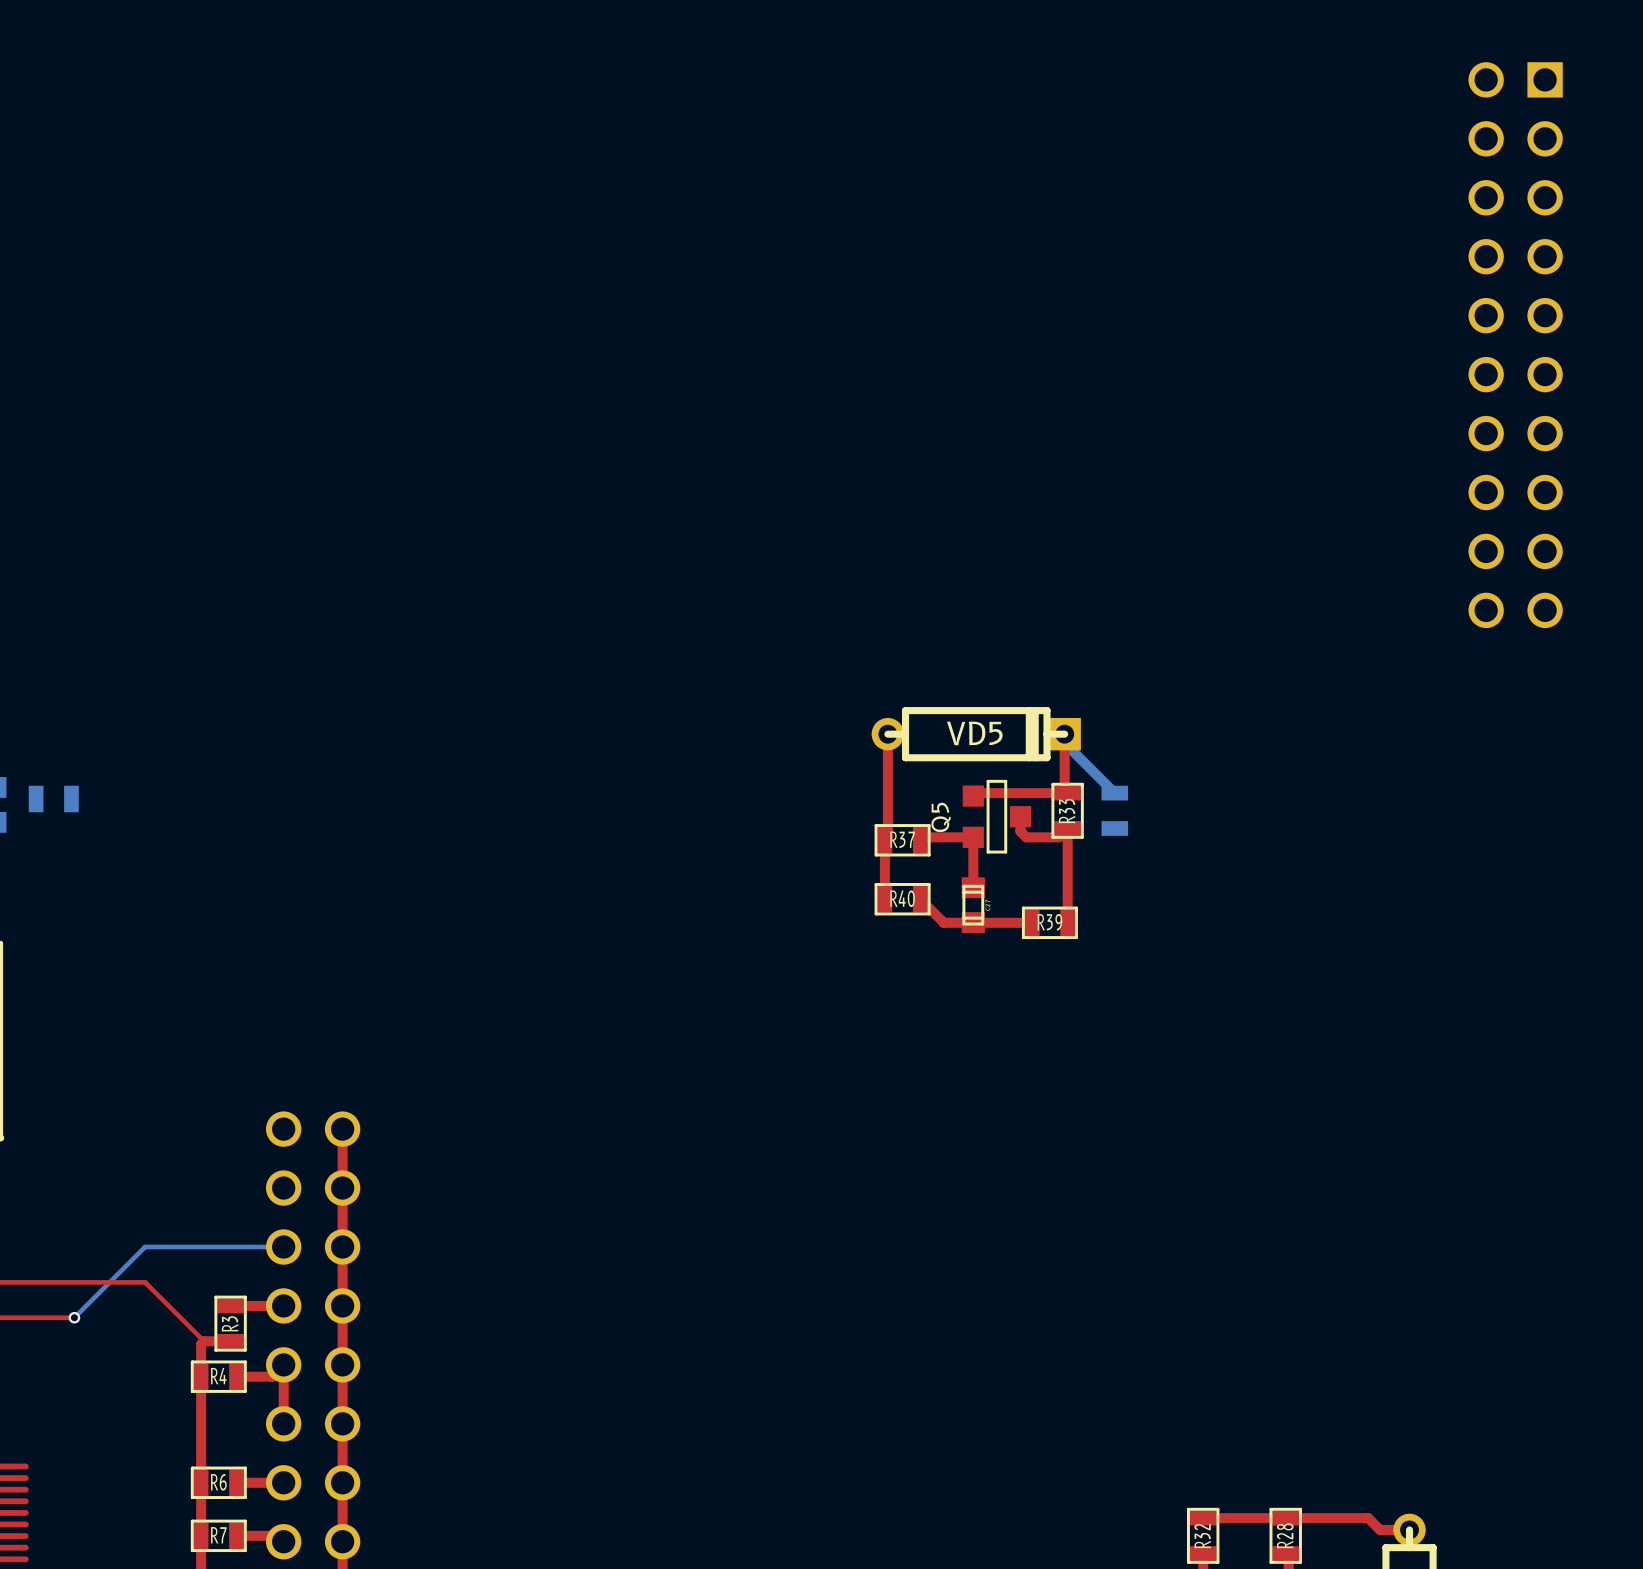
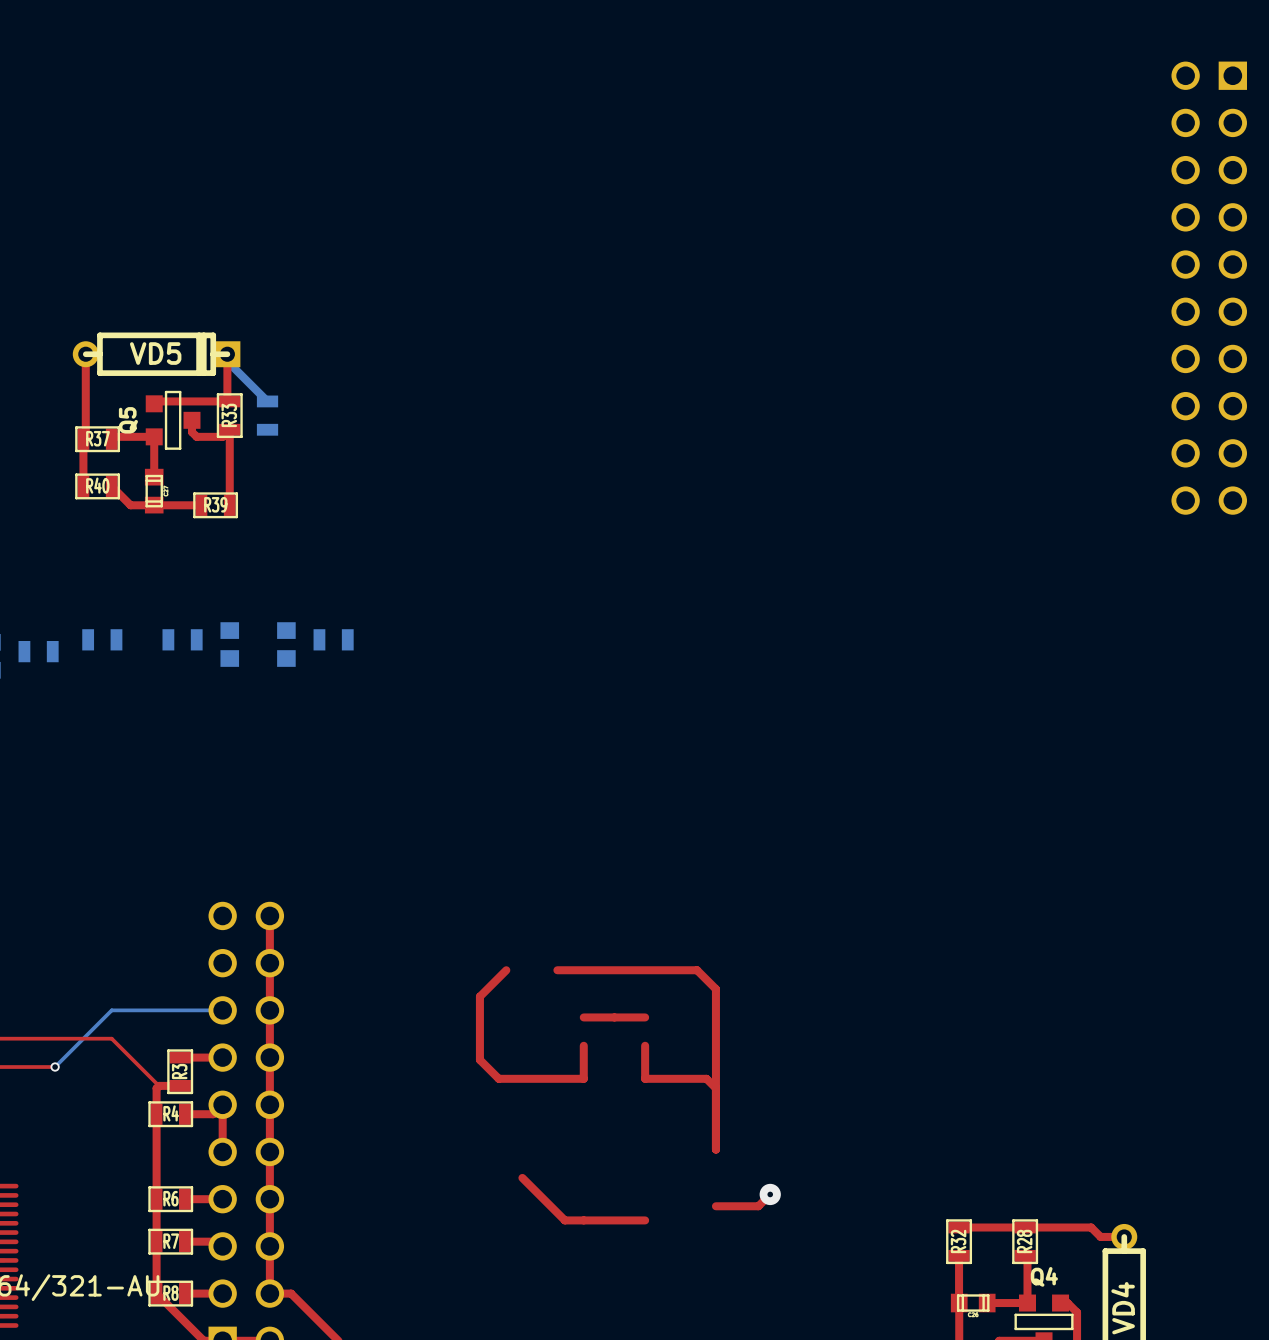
top track: none -> (85, 354) (83, 486)
bottom track: none -> (227, 354) (227, 361) (267, 401)
top track: none -> (227, 354) (227, 399) (229, 401) (156, 401) (154, 403)
part: none -> (267, 415)
top track: none -> (191, 420) (191, 432) (196, 436) (222, 436) (229, 429) (229, 505)
top track: none -> (111, 439) (114, 436) (154, 436) (154, 477)
top track: none -> (111, 486) (130, 505) (154, 505)
top track: none -> (154, 505) (201, 505)
top track: (887, 734) (887, 837) (884, 840) (884, 899) -> none
VD5 position: (976, 734) -> (156, 354)
bottom track: (1064, 734) (1064, 743) (1114, 793) -> none
top track: (1064, 734) (1064, 790) (1067, 793) (976, 793) (973, 796) -> none
part: none -> (102, 639)
part: none -> (182, 639)
part: none -> (333, 639)
part: none -> (229, 644)
part: none -> (286, 644)
R33 position: (1067, 810) -> (229, 415)
part: (1114, 810) -> none
Q5 position: (996, 816) -> (173, 420)
top track: (1020, 816) (1020, 831) (1026, 837) (1058, 837) (1067, 828) (1067, 922) -> none
R37 position: (902, 840) -> (97, 439)
top track: (920, 840) (923, 837) (973, 837) (973, 887) -> none
R40 position: (902, 899) -> (97, 486)
top track: (920, 899) (943, 922) (973, 922) -> none
part position: (973, 905) -> (154, 491)
top track: (973, 922) (1032, 922) -> none
R39 position: (1049, 922) -> (215, 505)
top track: none -> (506, 970) (479, 996) (479, 1059) (498, 1078) (583, 1078) (583, 1045)
top track: none -> (557, 970) (697, 970) (715, 989) (715, 1149)
top track: none -> (583, 1017) (645, 1017)
top track: none -> (645, 1045) (645, 1078) (706, 1078) (715, 1088)
top track: none -> (522, 1177) (564, 1220) (645, 1220)
top track: none -> (770, 1194) (758, 1206) (715, 1206)
via: none -> (770, 1194)

